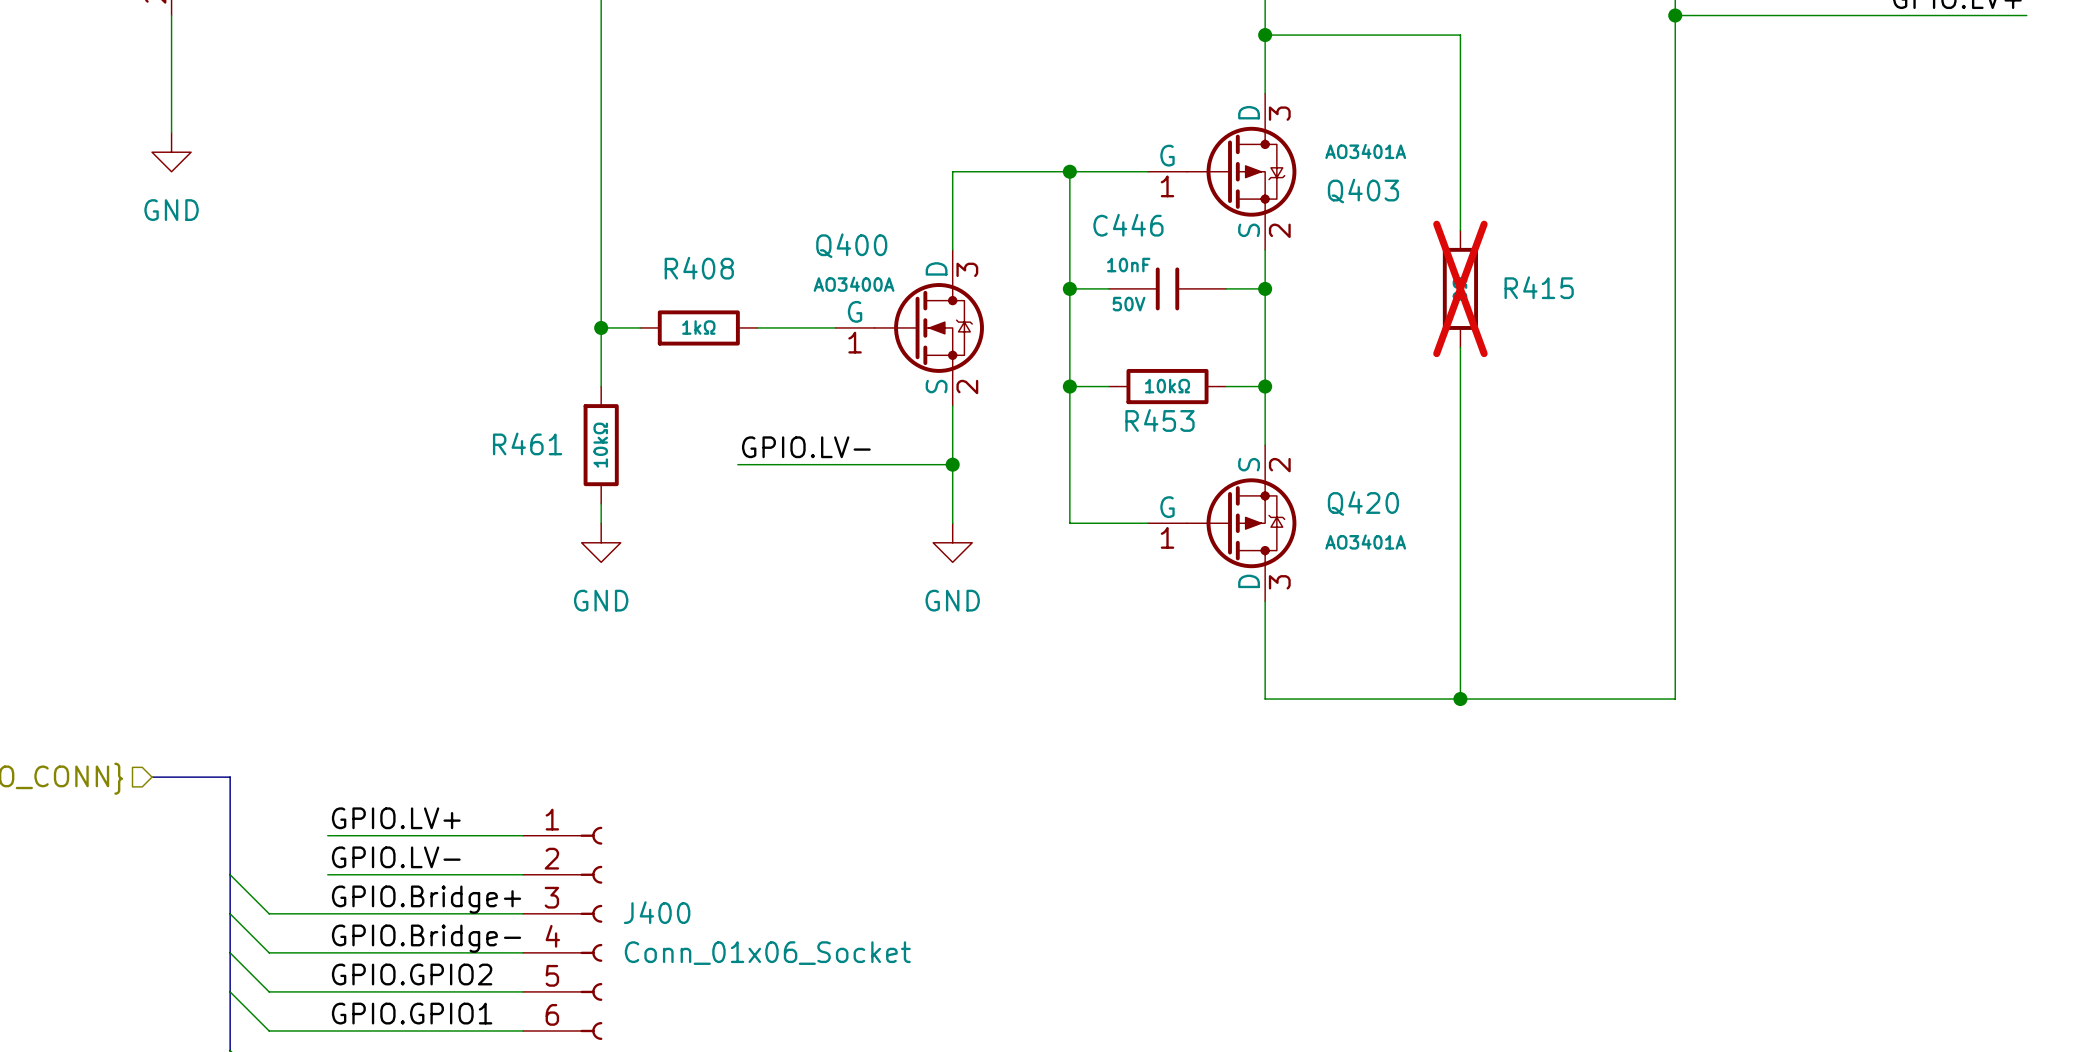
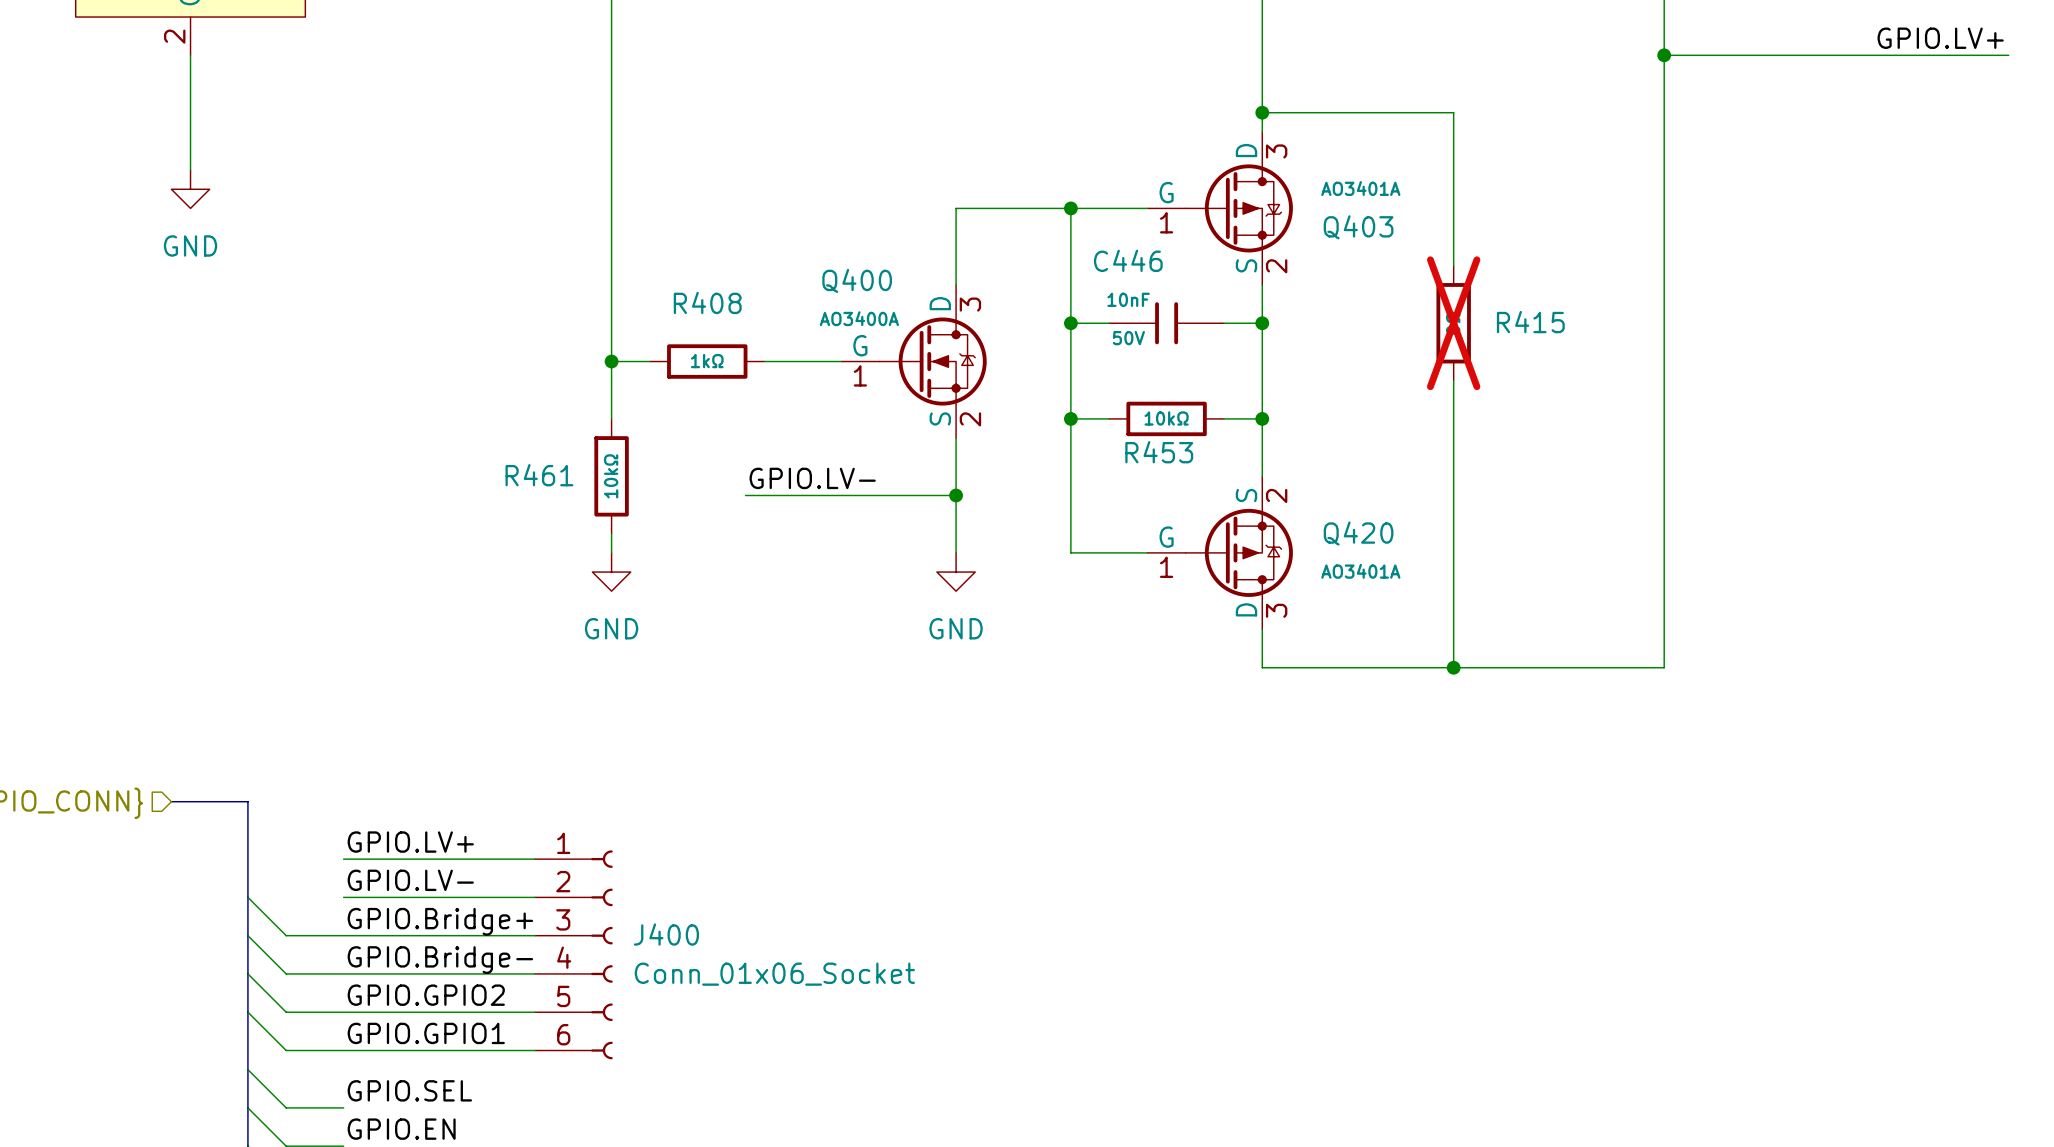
wire: (1265, 35) (1460, 35) (1460, 74) -> (1262, 112) (1453, 112)
junction position: (1265, 35) -> (1262, 112)
wire: (1265, 640) (1265, 699) (1675, 699) (1675, 640) -> (1262, 667) (1664, 667)
wire: (1460, 640) (1460, 699) -> none
junction position: (1460, 699) -> (1453, 667)

